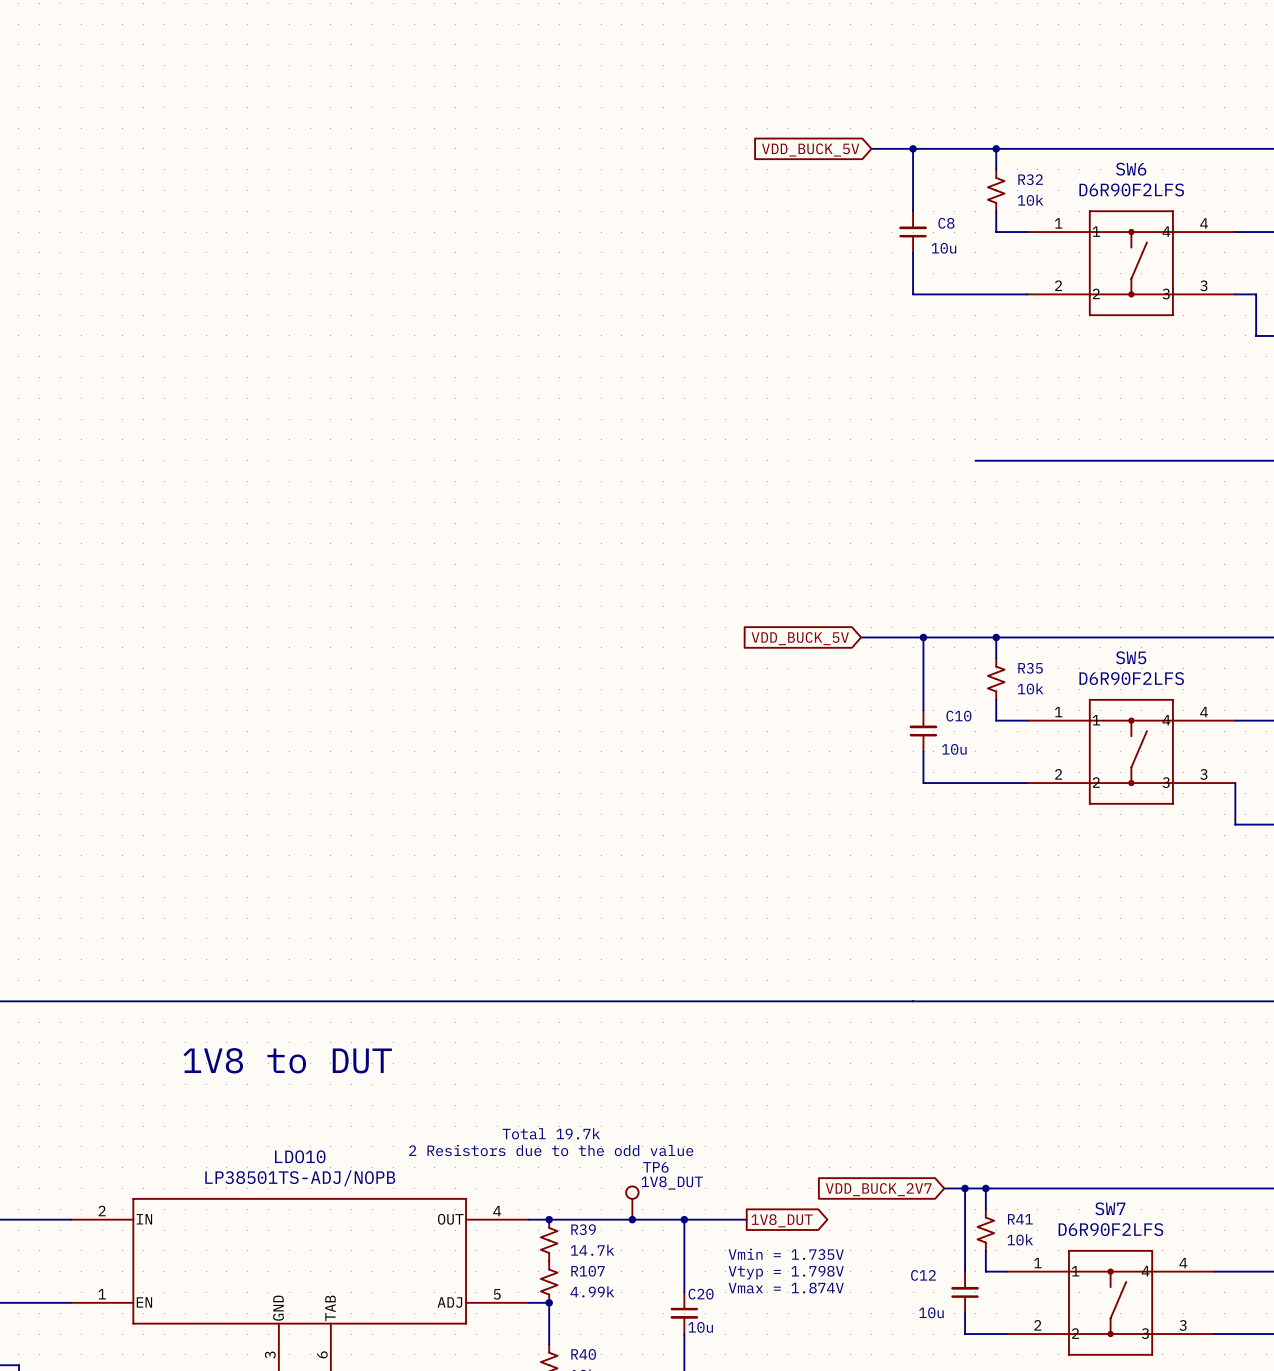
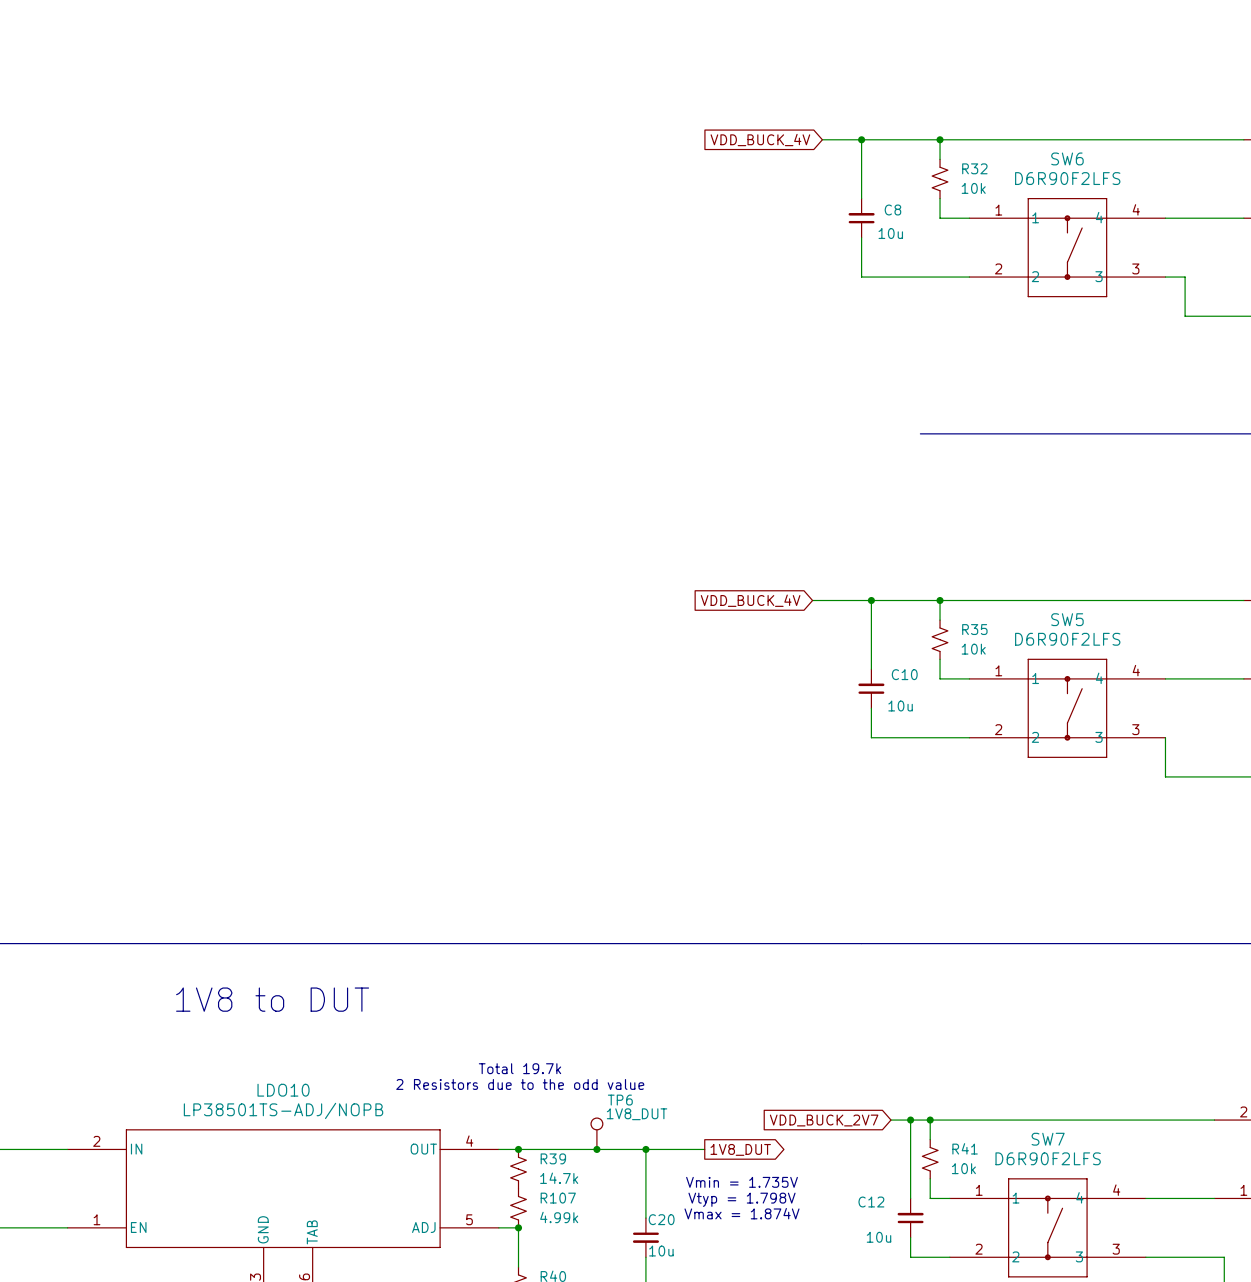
global label: VDD_BUCK_5V (810, 150) -> VDD_BUCK_4V (760, 140)
global label: VDD_BUCK_5V (800, 638) -> VDD_BUCK_4V (750, 600)

